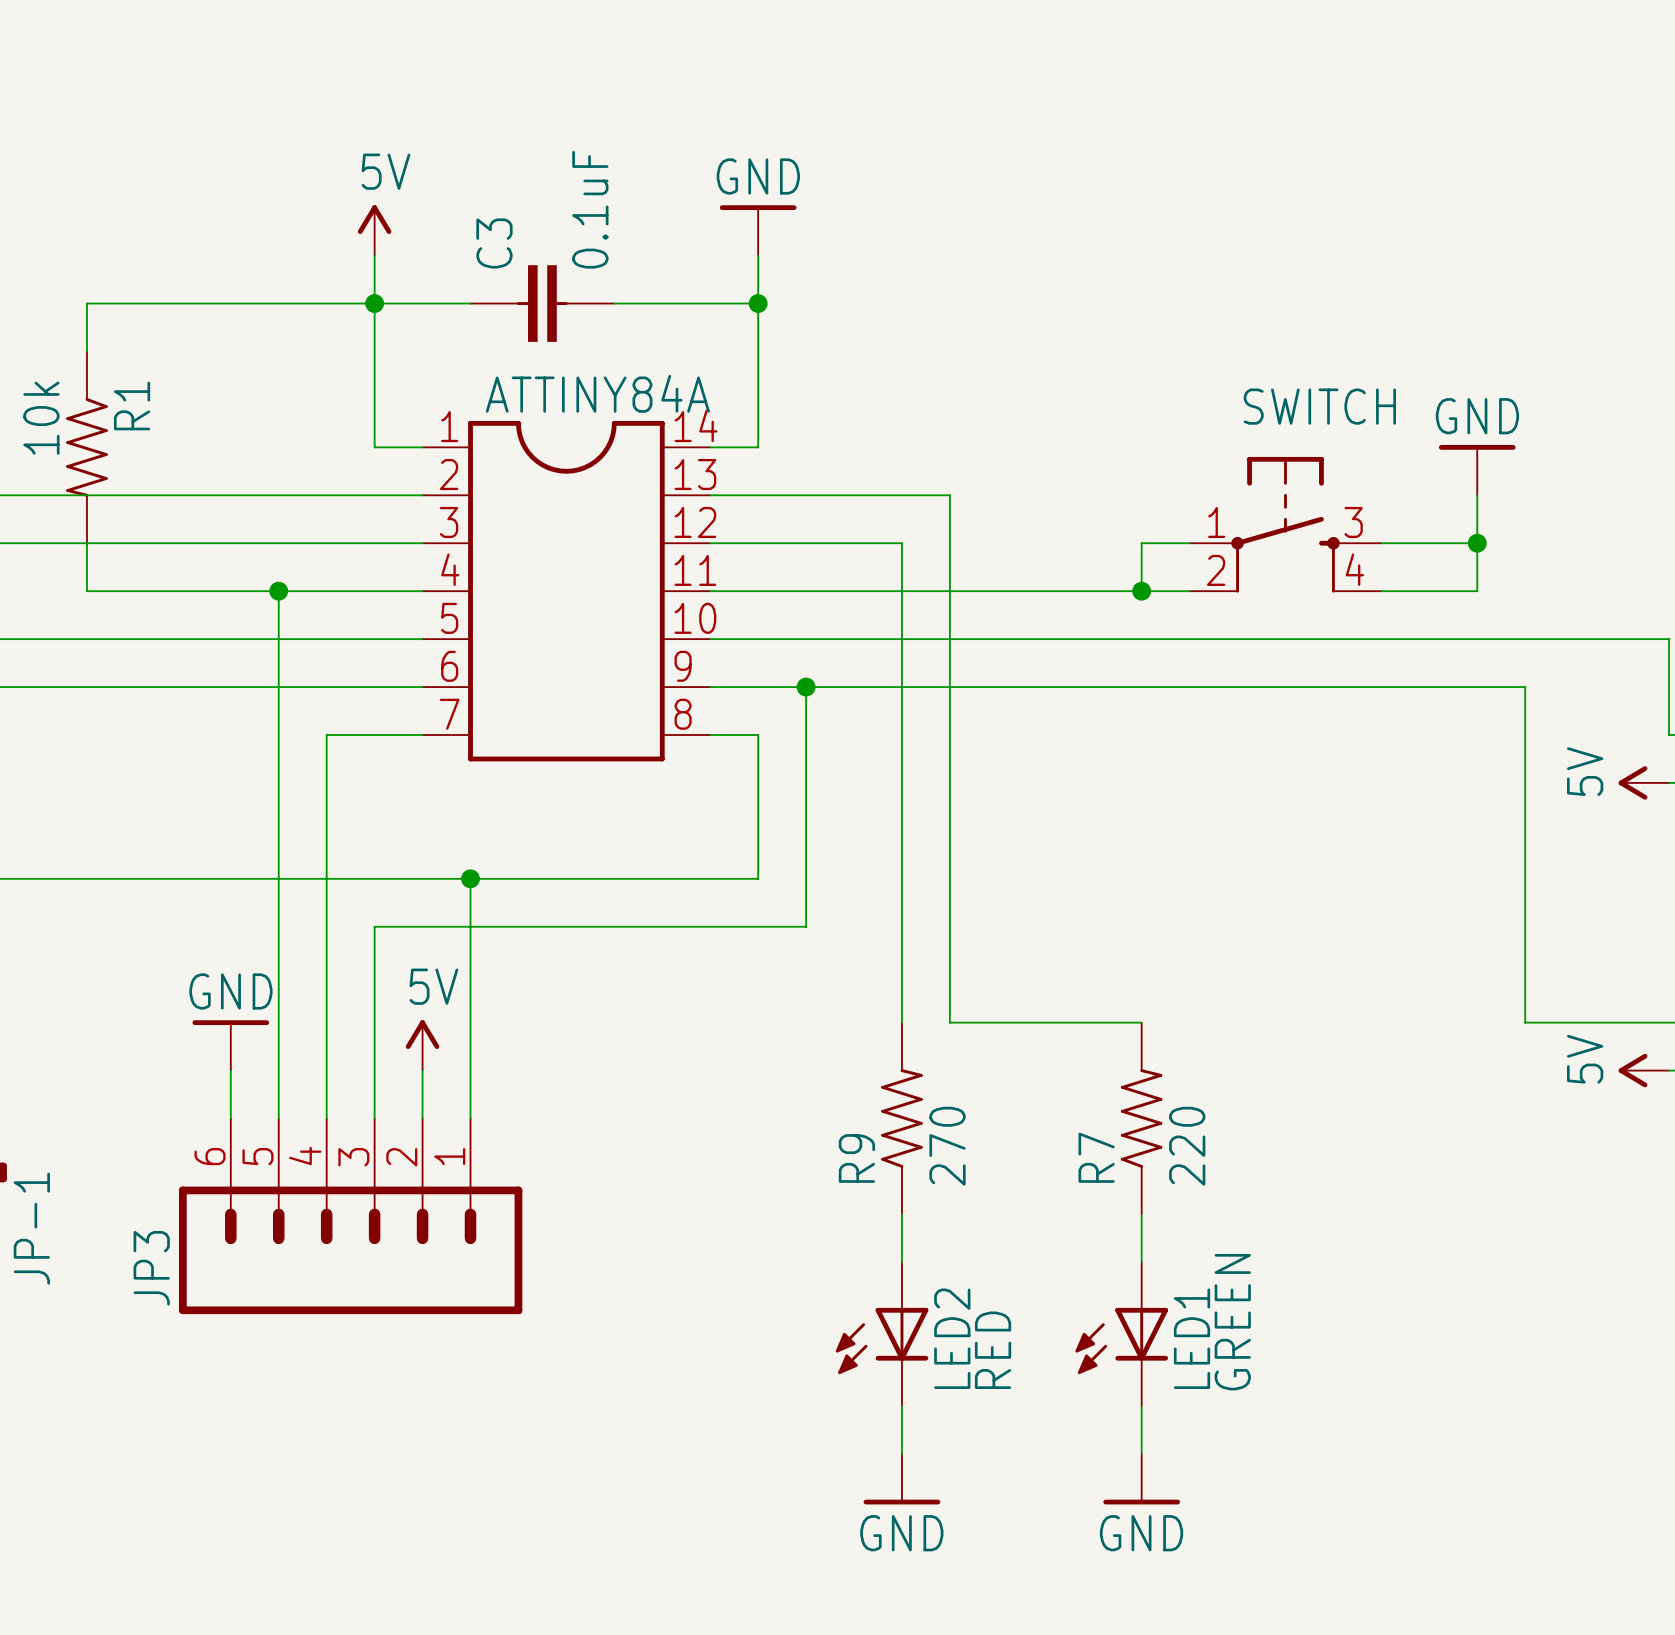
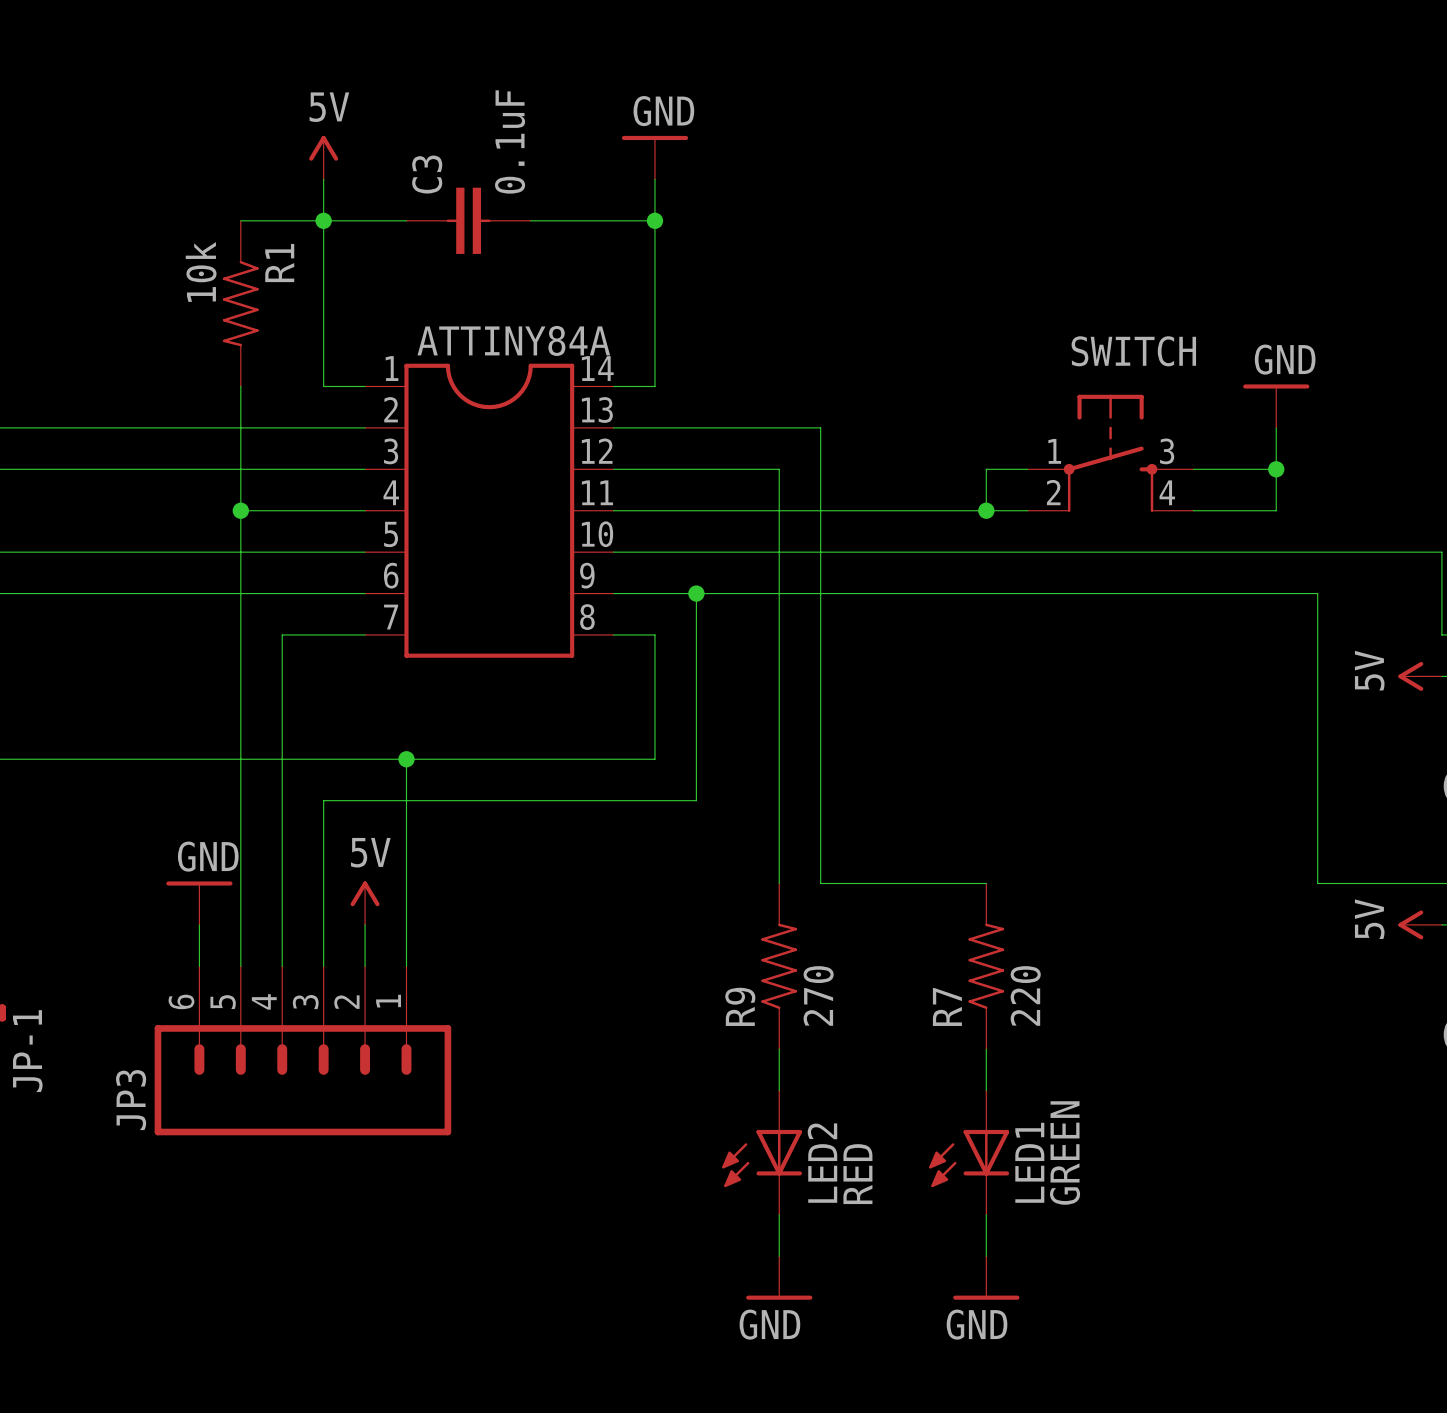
wire: none -> (654, 179) (654, 220) (530, 220)
power symbol position: 5V (374, 230) -> 5V (323, 157)
power symbol position: GND (758, 230) -> GND (654, 157)
wire: none -> (240, 220) (406, 220)
junction position: (374, 303) -> (323, 220)
wire: (470, 303) (86, 303) (86, 351) -> none
C3 position: (542, 303) -> (468, 220)
wire: (614, 303) (758, 303) -> none
junction position: (758, 303) -> (654, 220)
R1 position: (86, 447) -> (240, 303)
wire: (86, 543) (86, 591) (278, 591) -> (240, 386) (240, 510)

